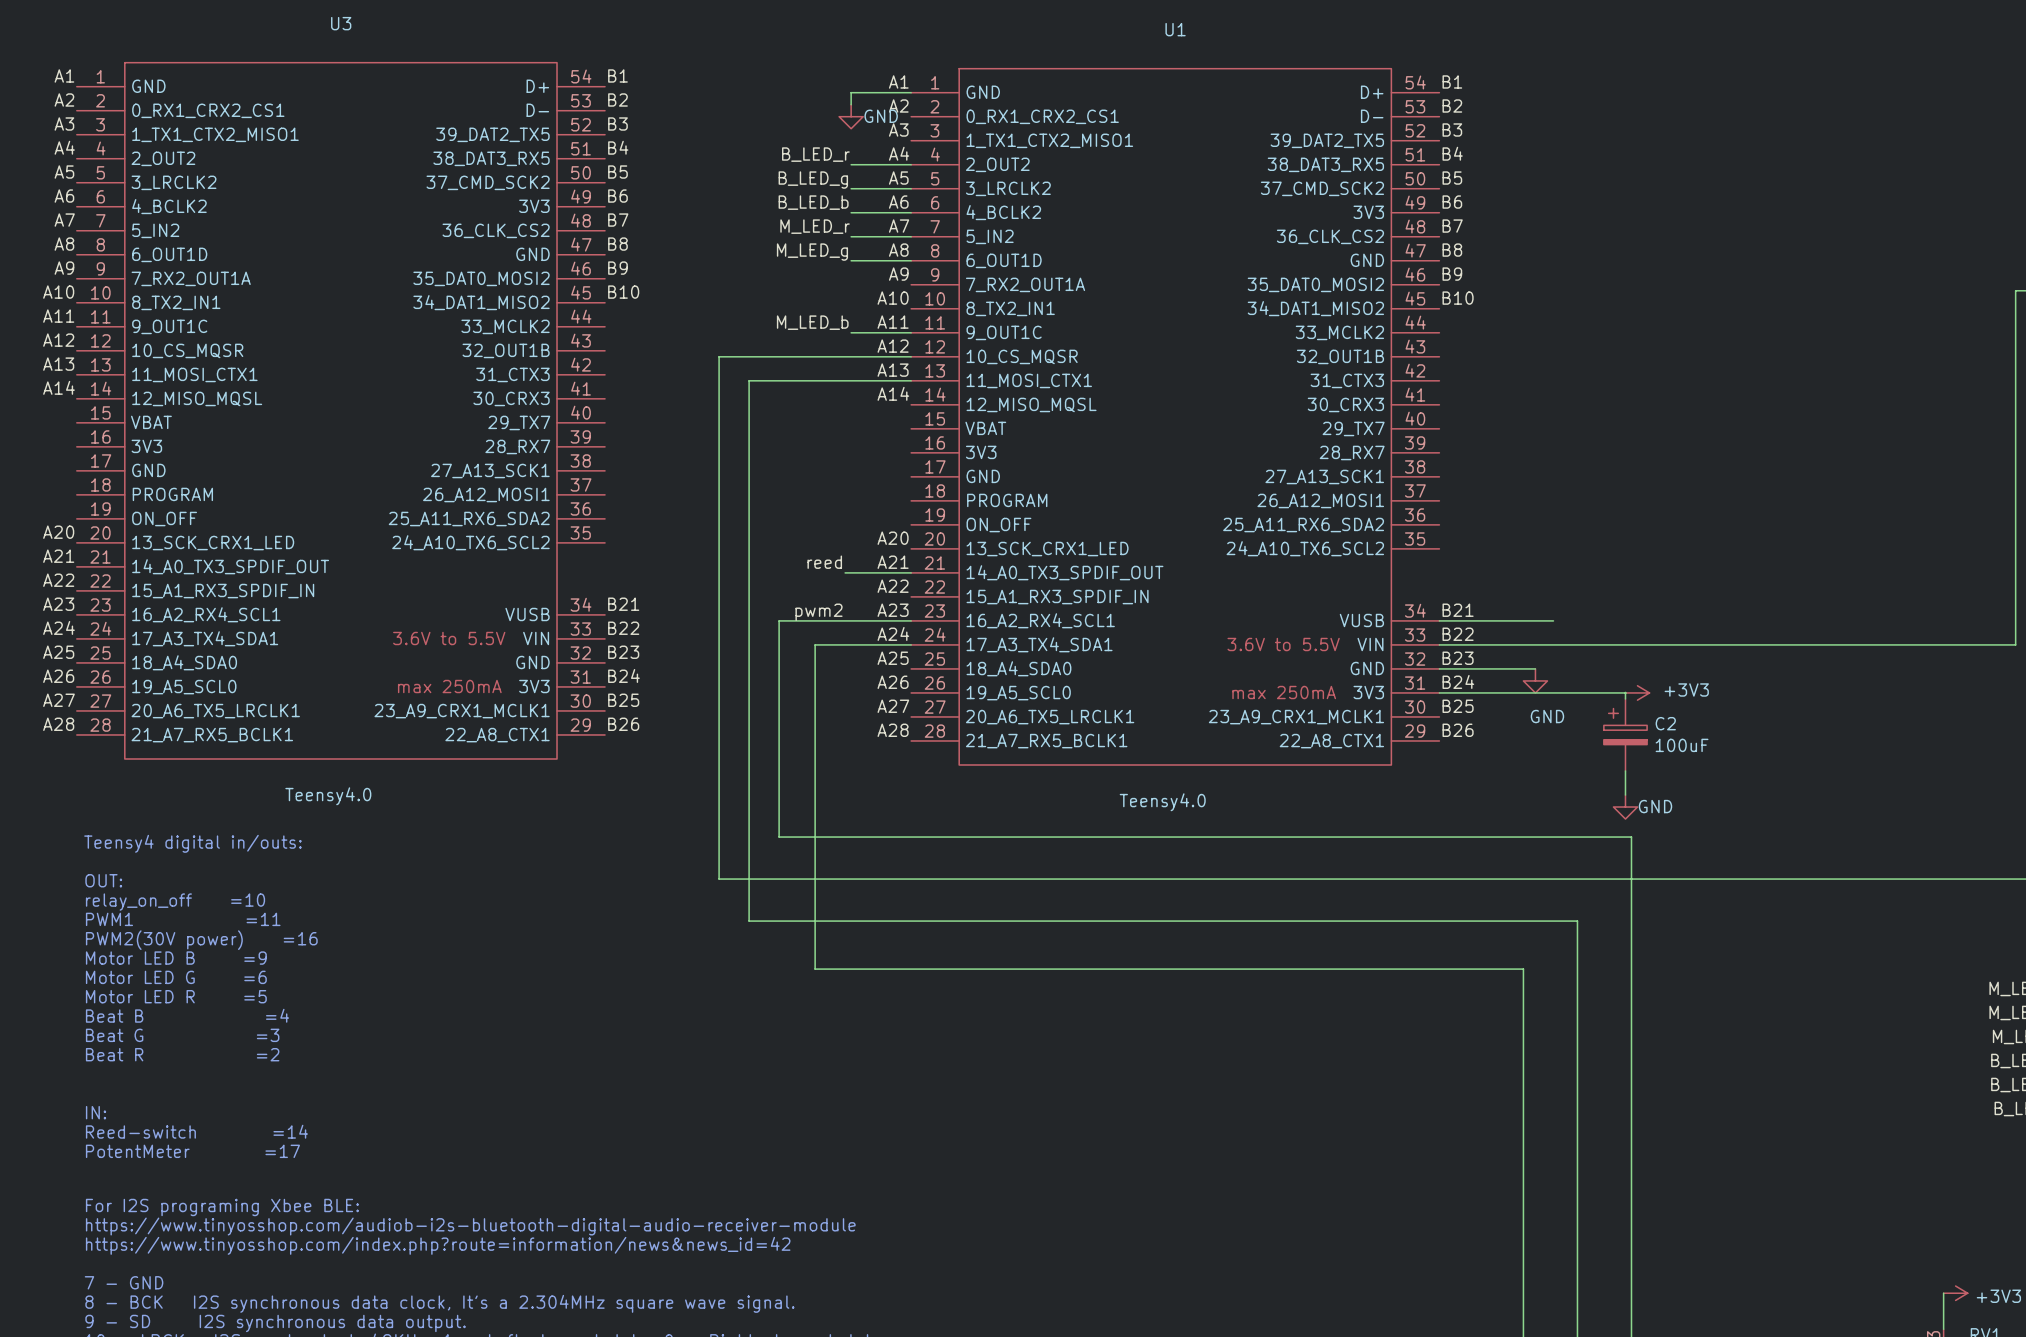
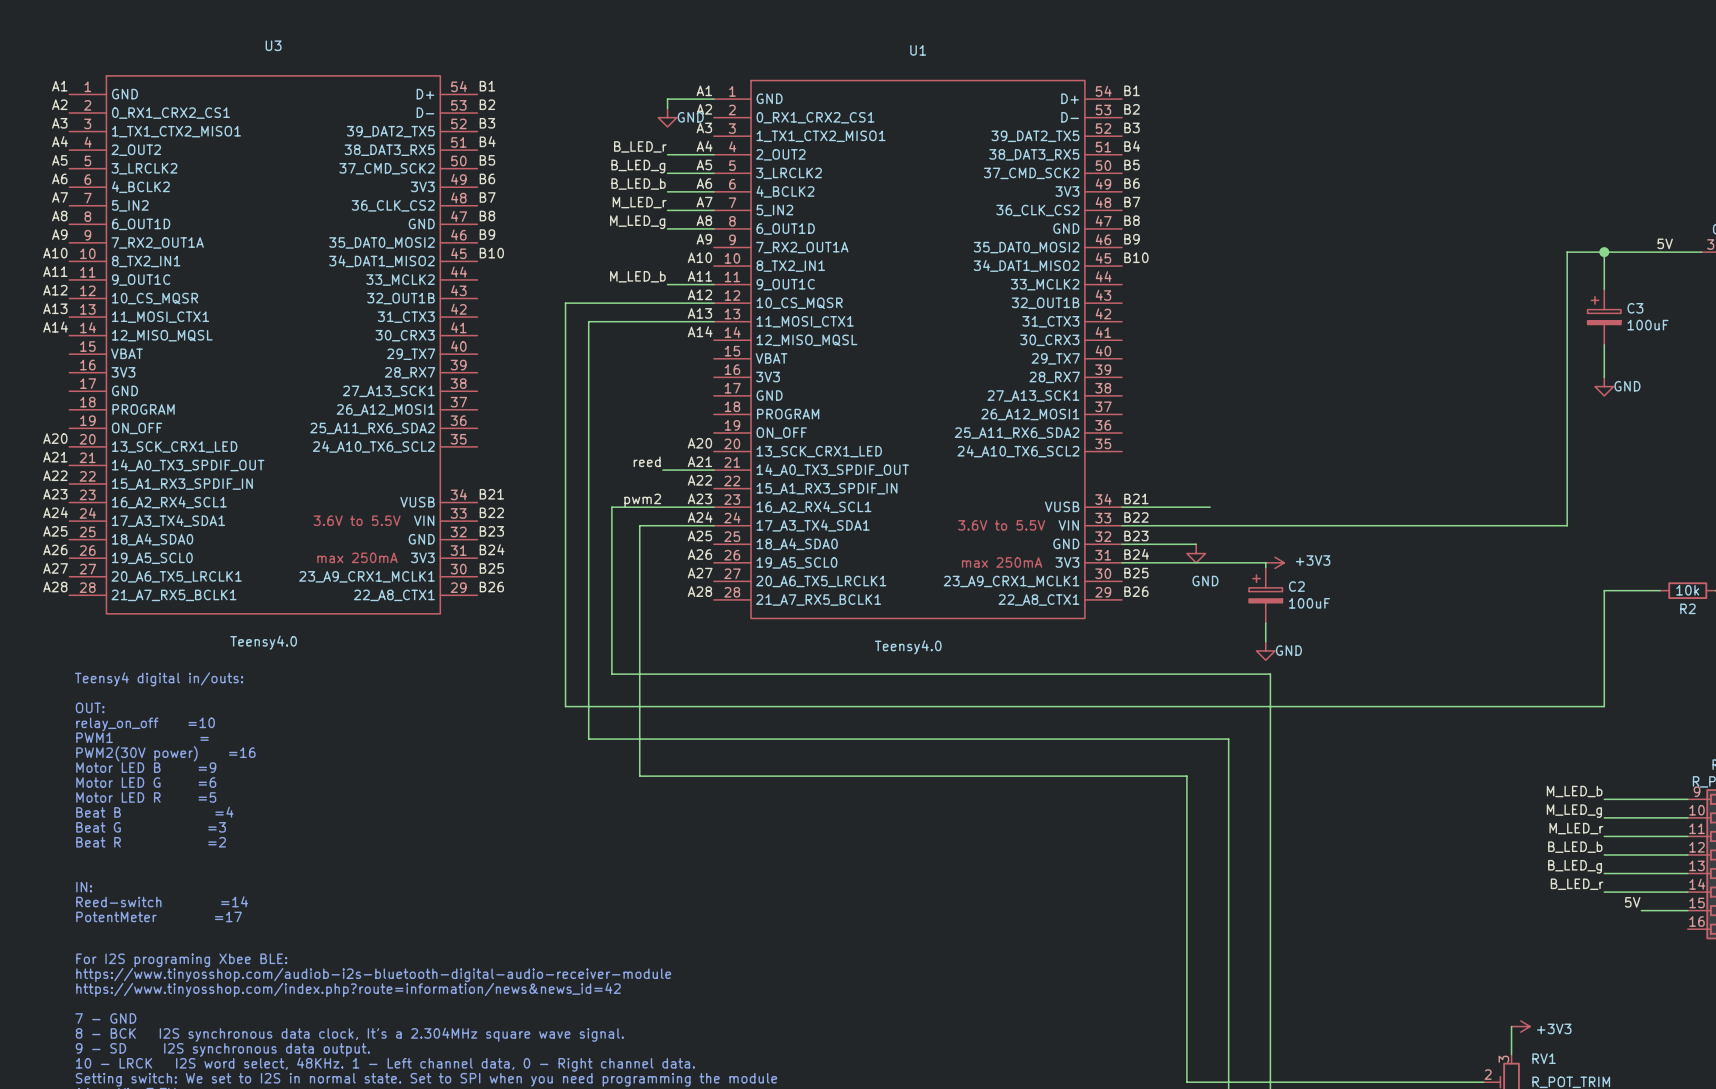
text: PWM1 =11 (183, 919) -> PWM1 = (142, 737)

